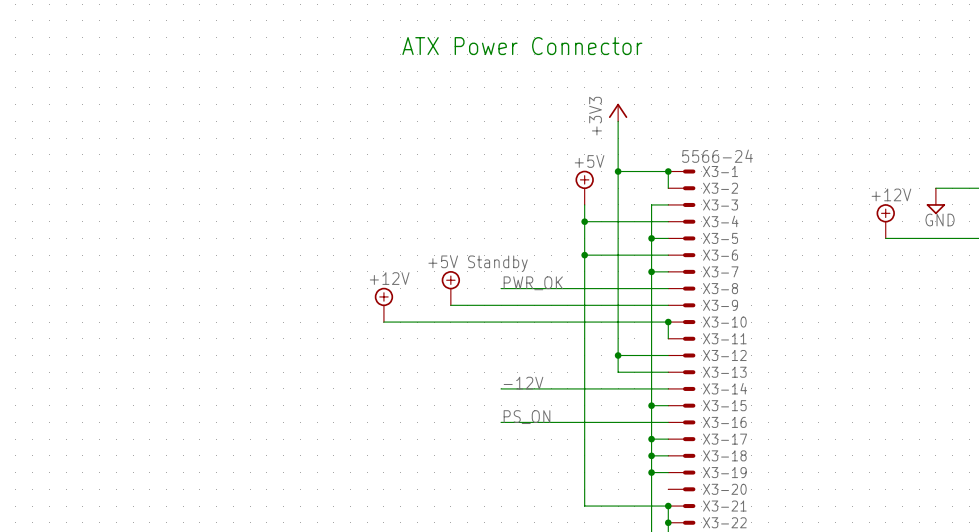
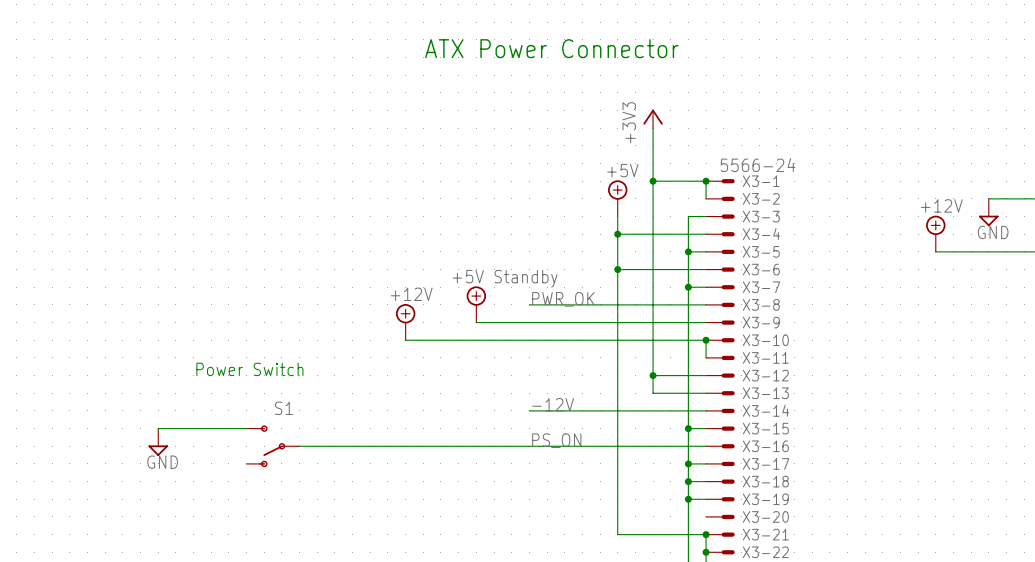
text: none -> Power Switch (249, 369)
wire: none -> (158, 428) (246, 428)
power symbol: none -> GND (158, 442)
S1: none -> (273, 446)
wire: none -> (299, 446) (529, 446)

